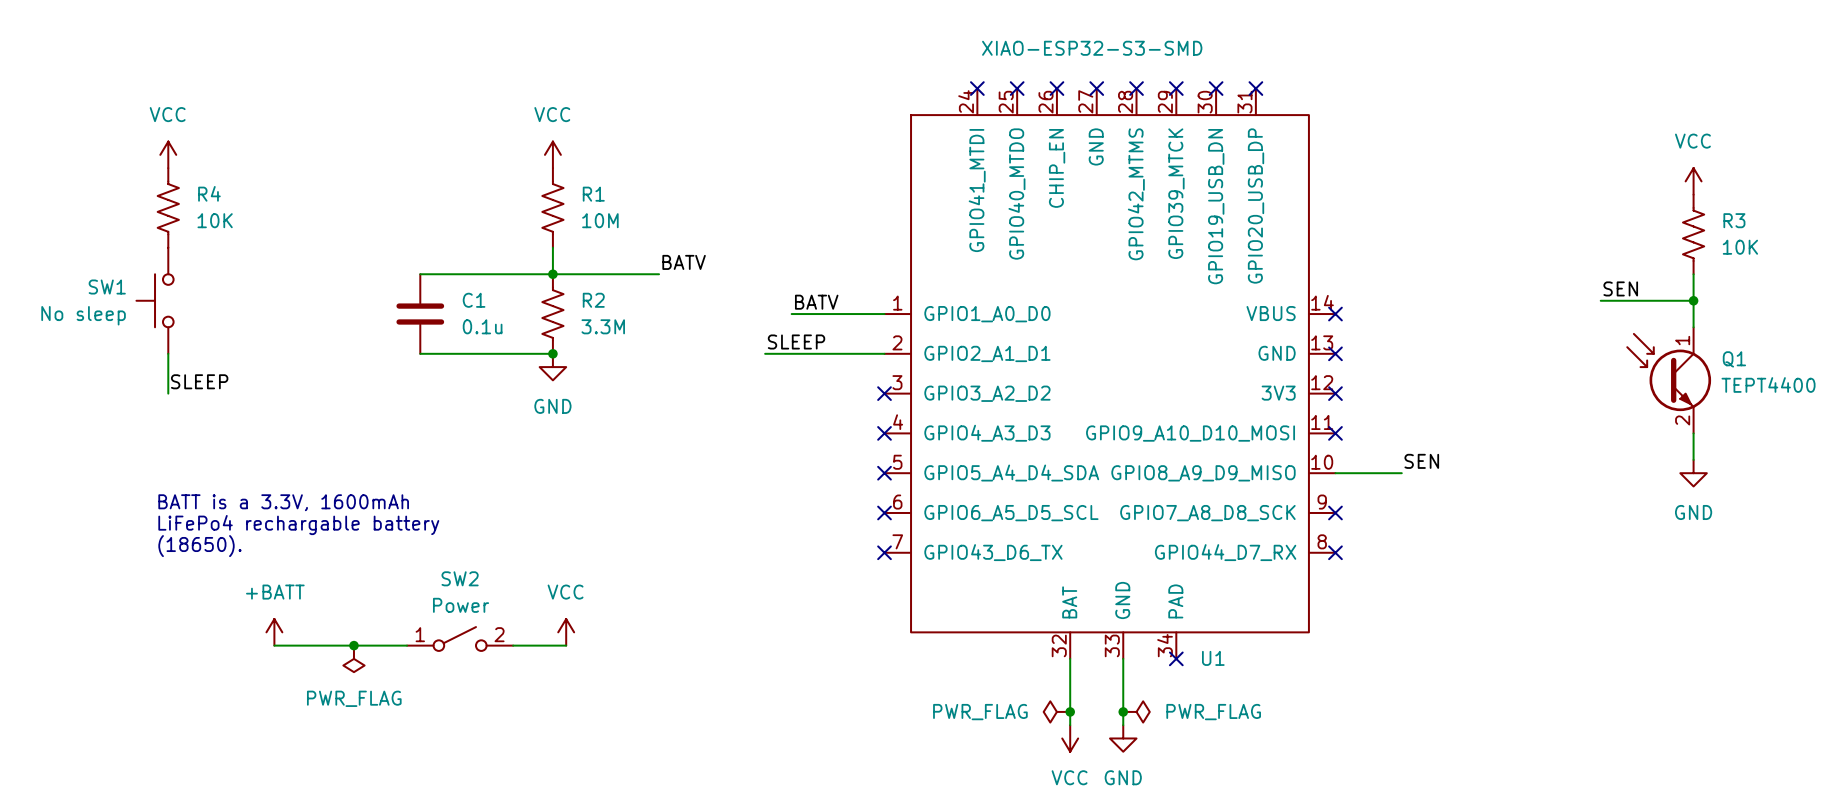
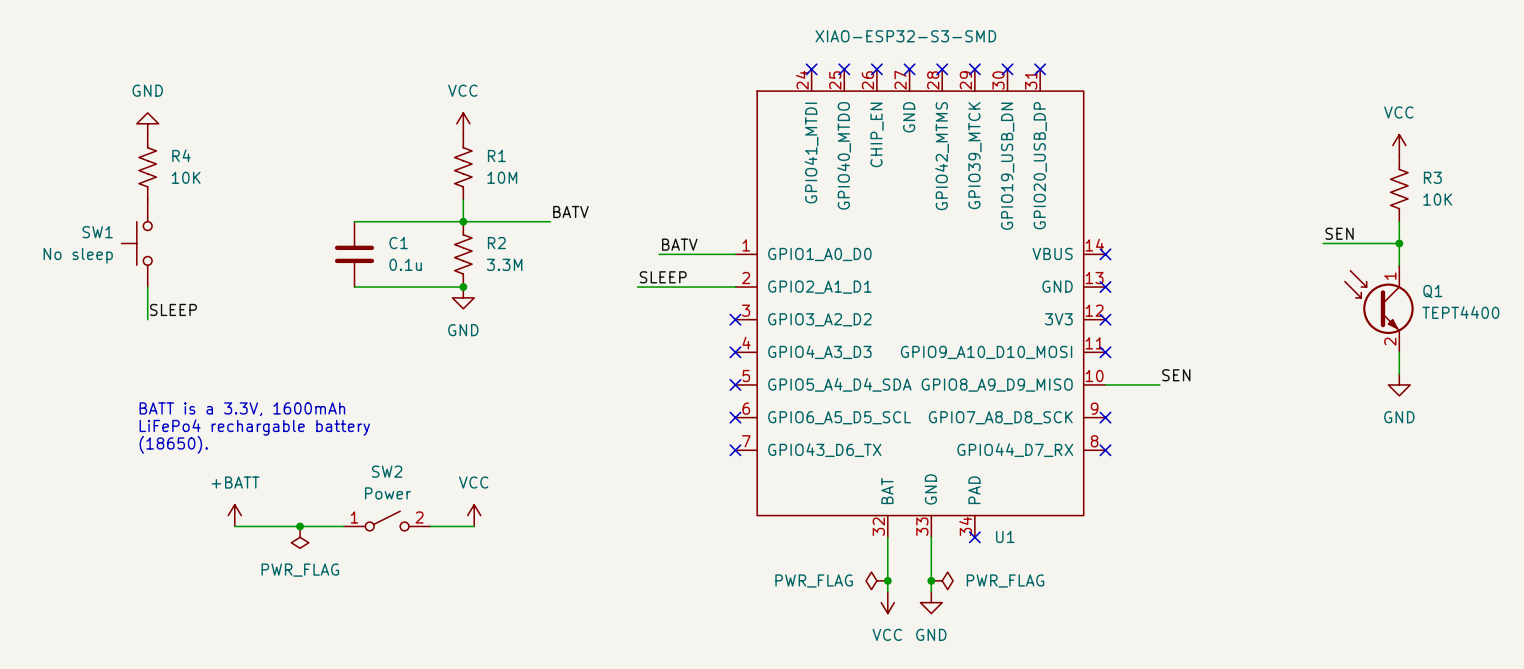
power symbol: VCC (168, 154) -> GND (147, 123)

